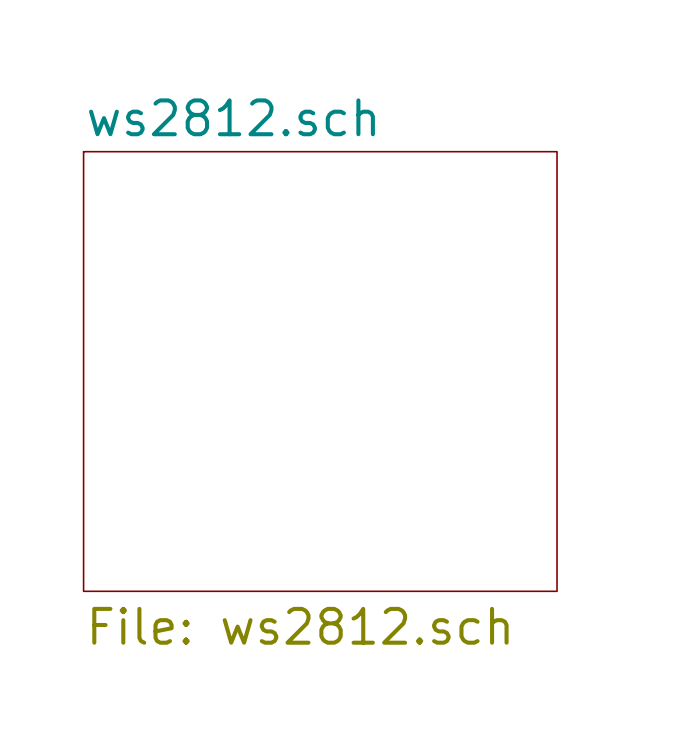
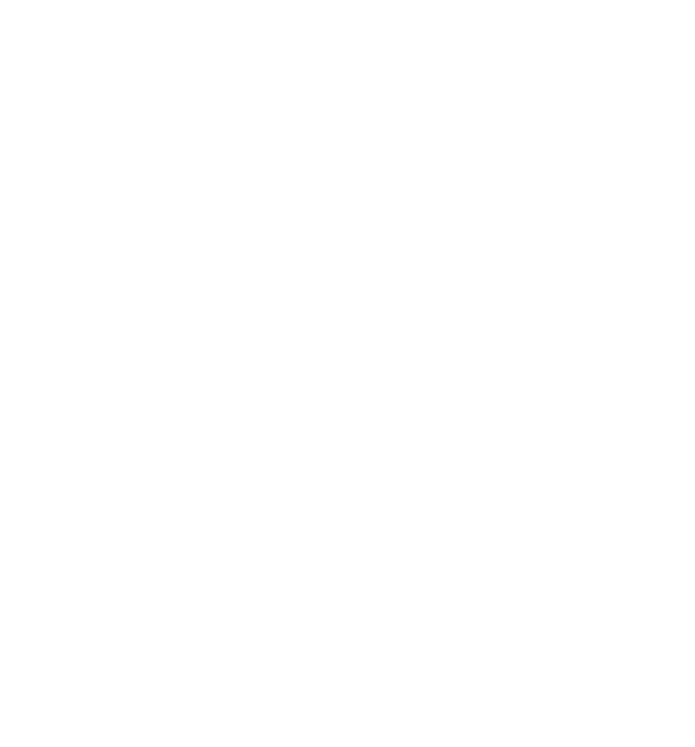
sheet ws2812.sch: File: ws2812.sch (320, 371) -> none

